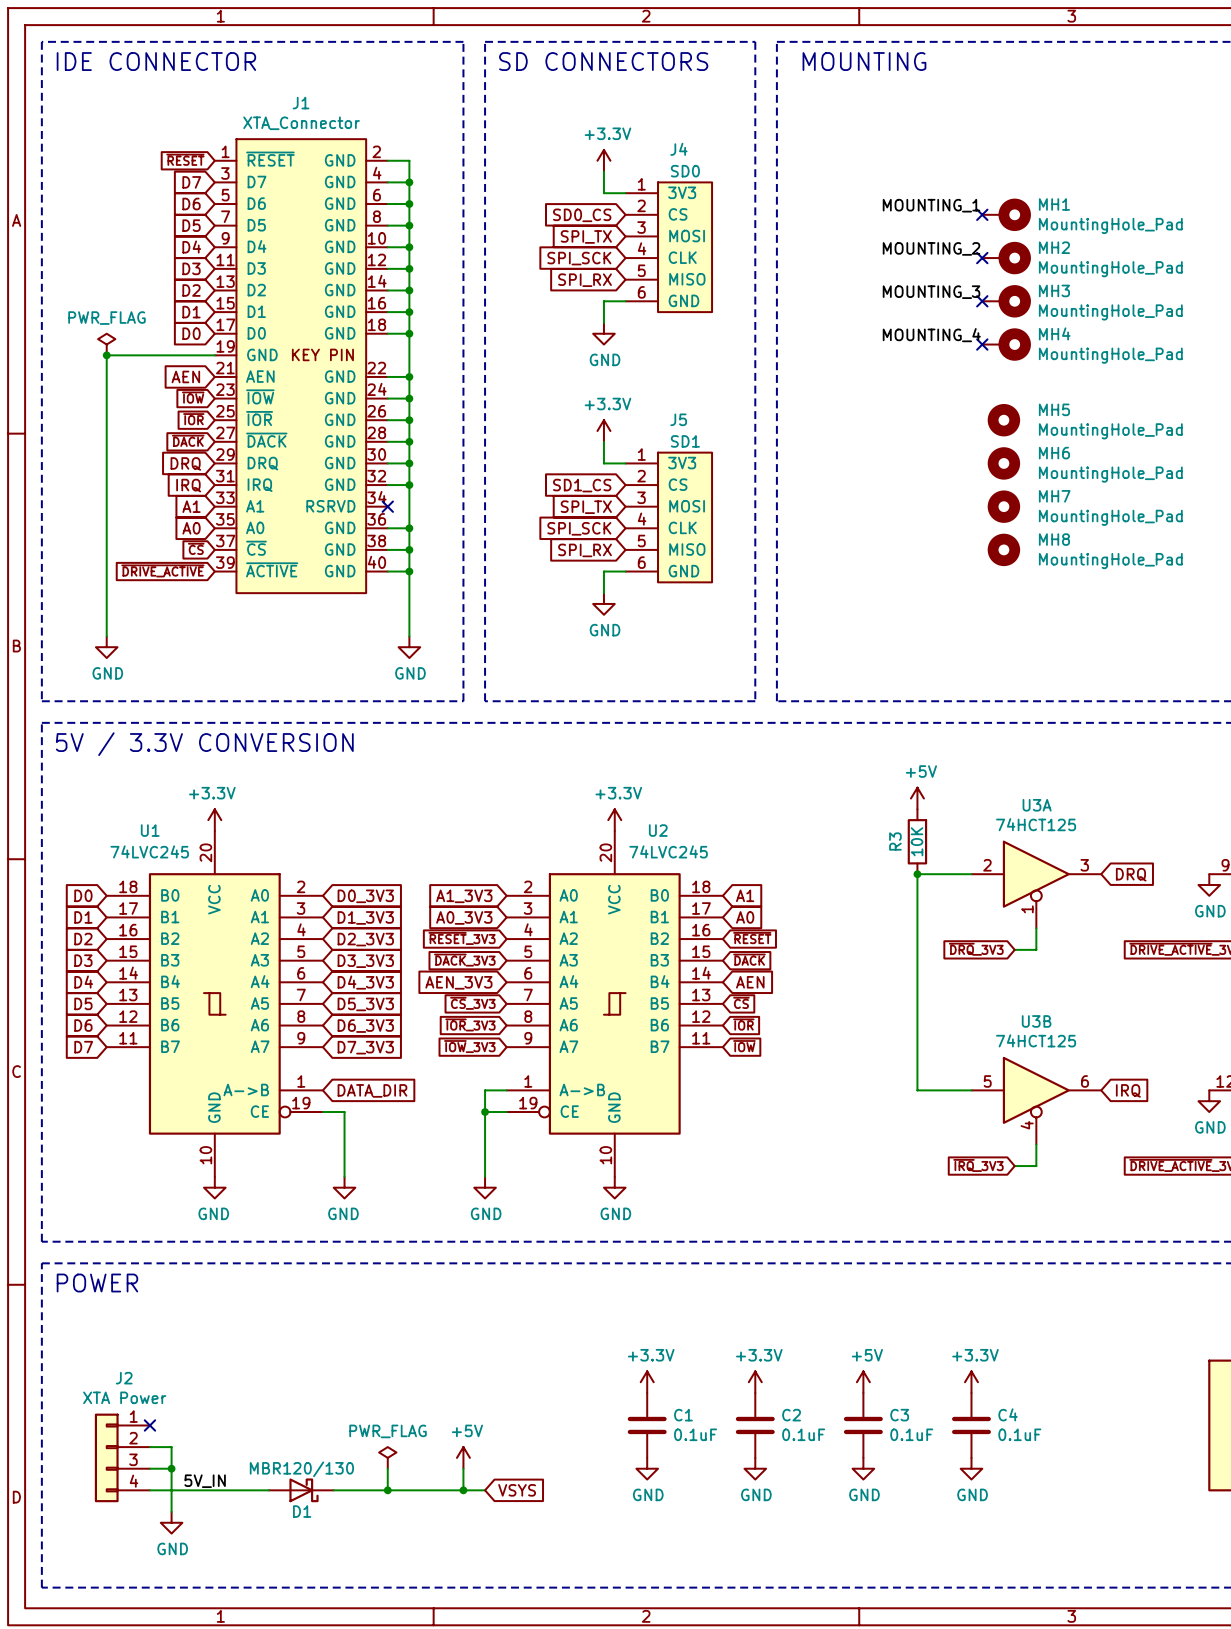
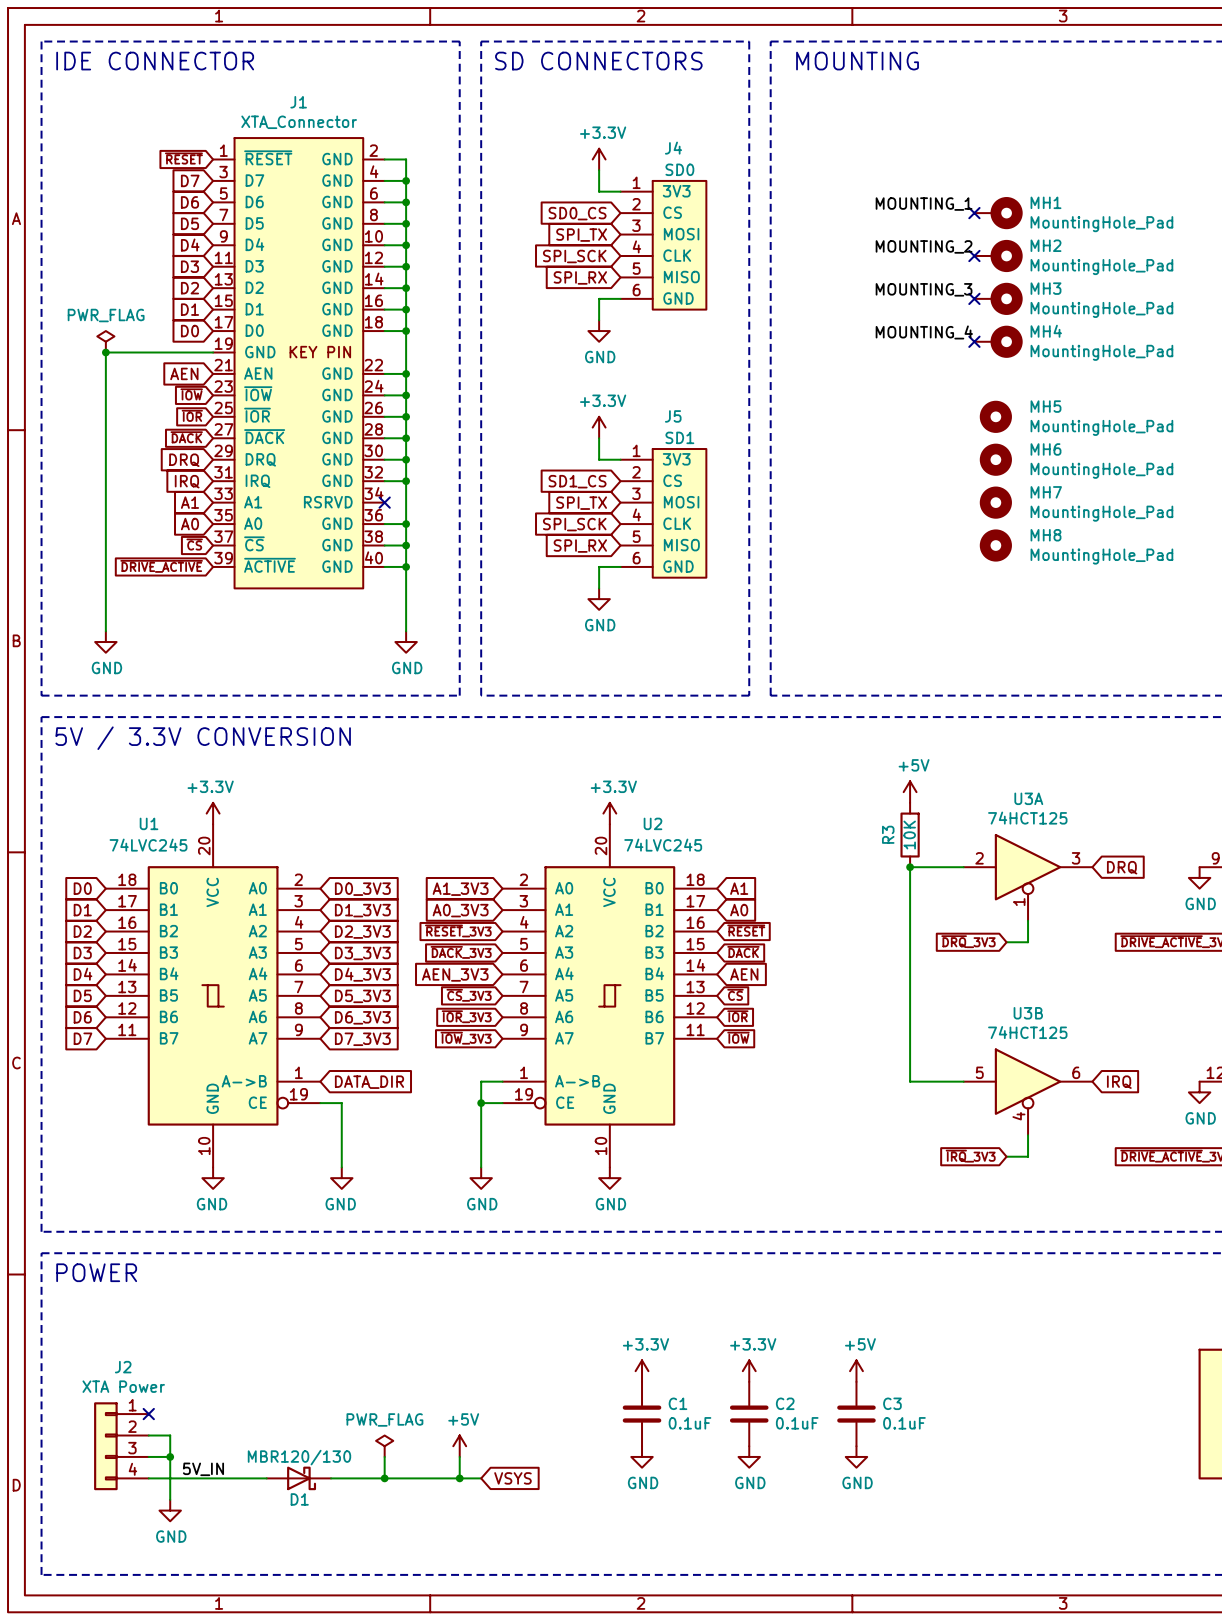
power symbol: +3.3V (971, 1382) -> none
C4: 0.1uF (971, 1425) -> none
power symbol: GND (971, 1468) -> none

